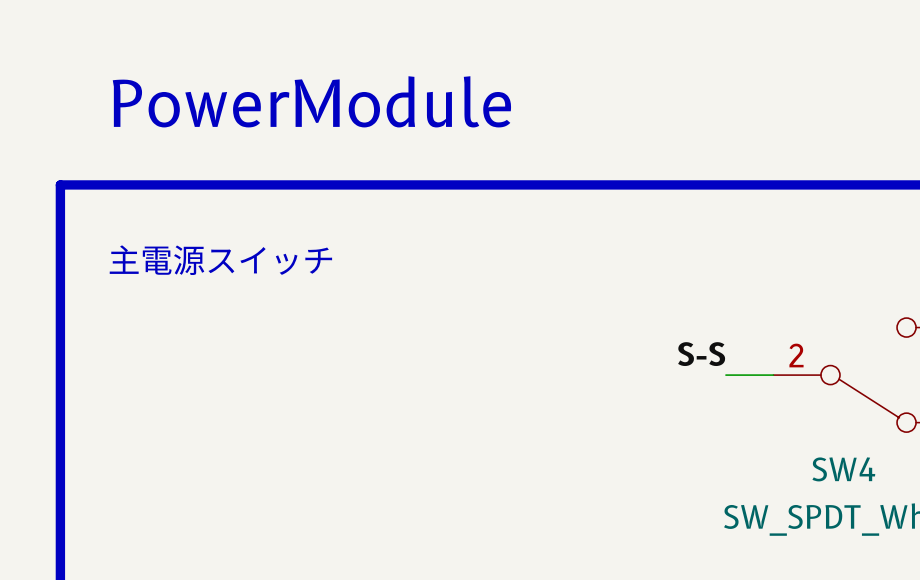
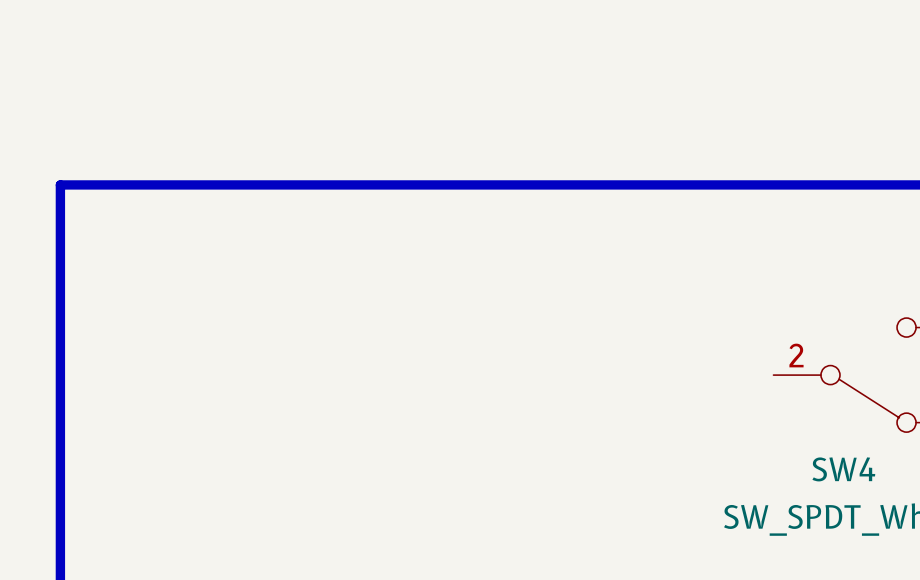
text: PowerModule (311, 101) -> none
text: 主電源スイッチ (220, 260) -> none
label: S-S (701, 354) -> none
wire: (725, 375) (773, 375) -> none

